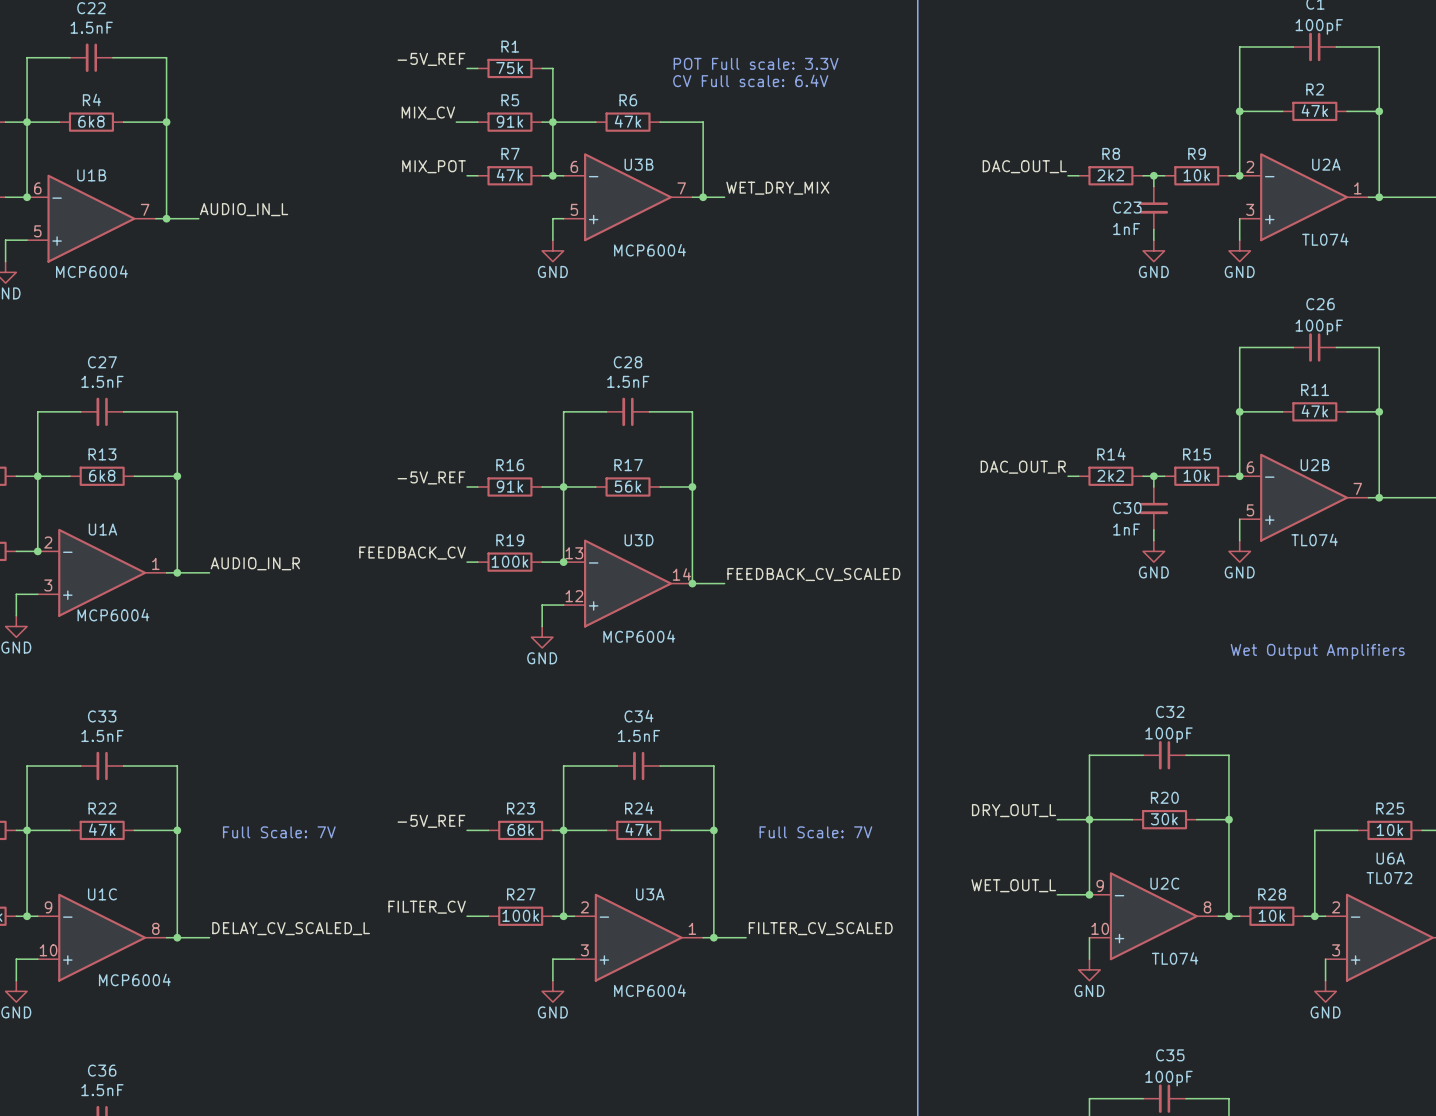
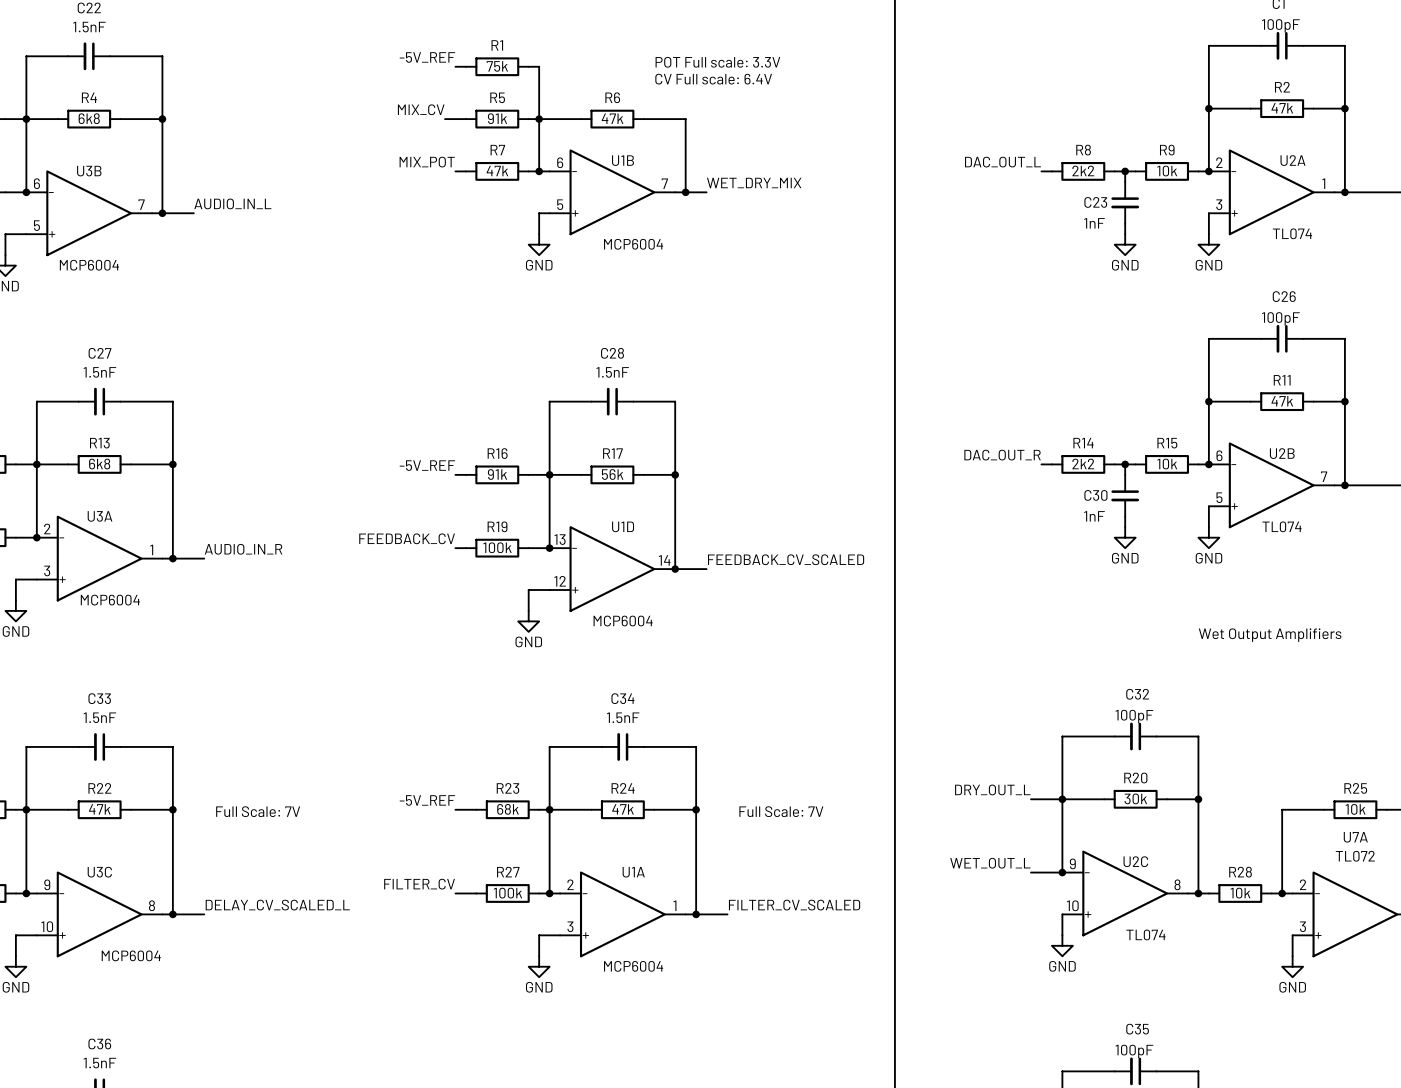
U3B name: U3B (639, 164) -> U1B (622, 160)
U1B name: U1B (91, 175) -> U3B (89, 171)
U1A name: U1A (102, 529) -> U3A (100, 516)
U3D name: U3D (639, 540) -> U1D (623, 526)
U6A name: U6A (1390, 858) -> U7A (1355, 837)
U1C name: U1C (102, 894) -> U3C (99, 872)
U3A name: U3A (650, 894) -> U1A (633, 872)

